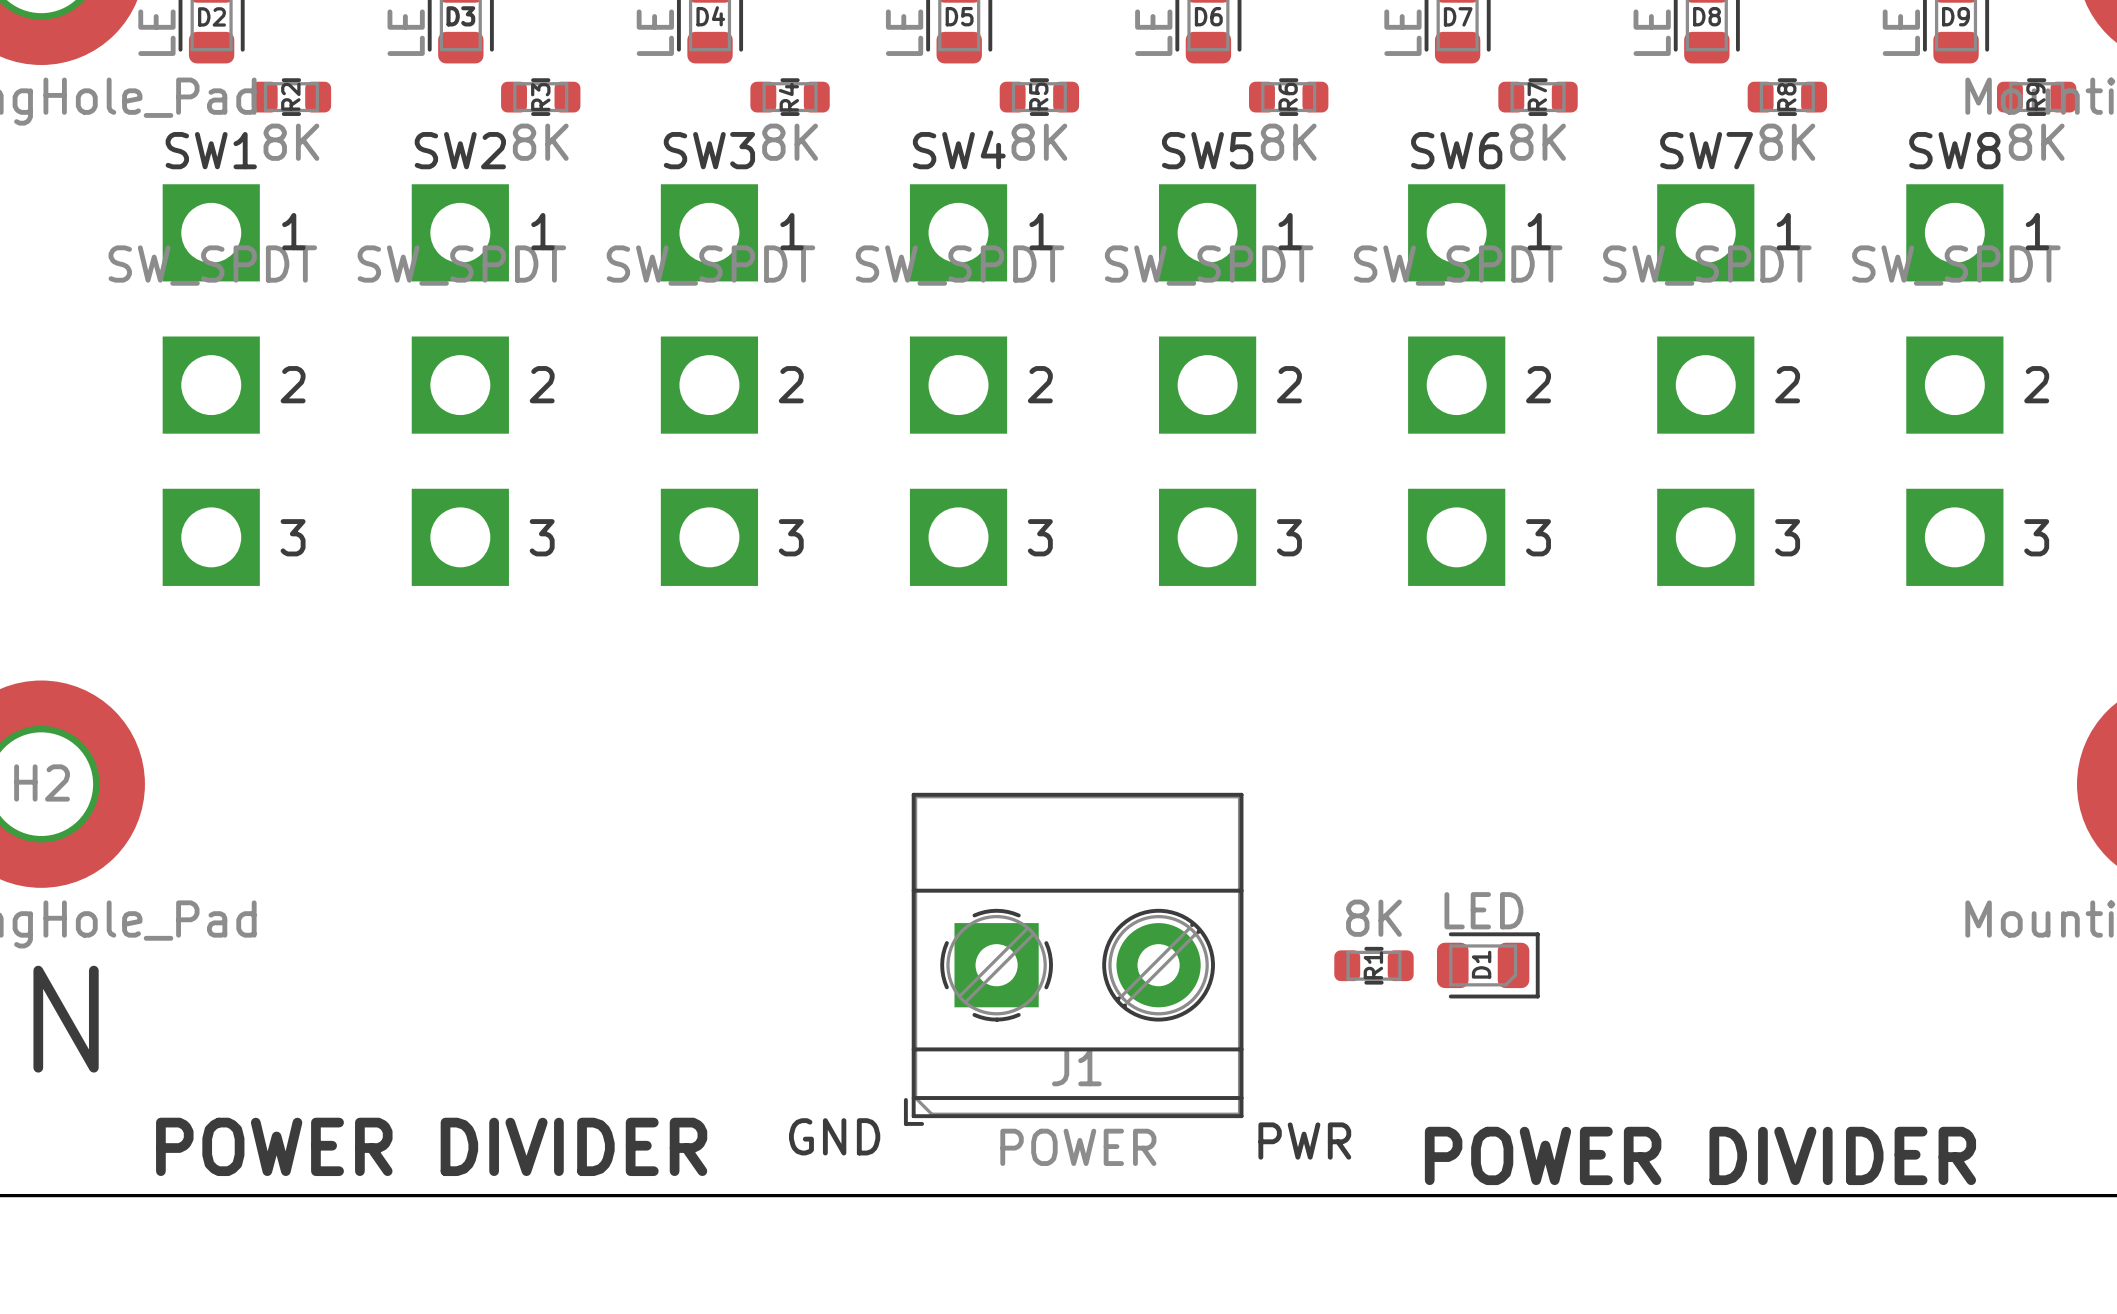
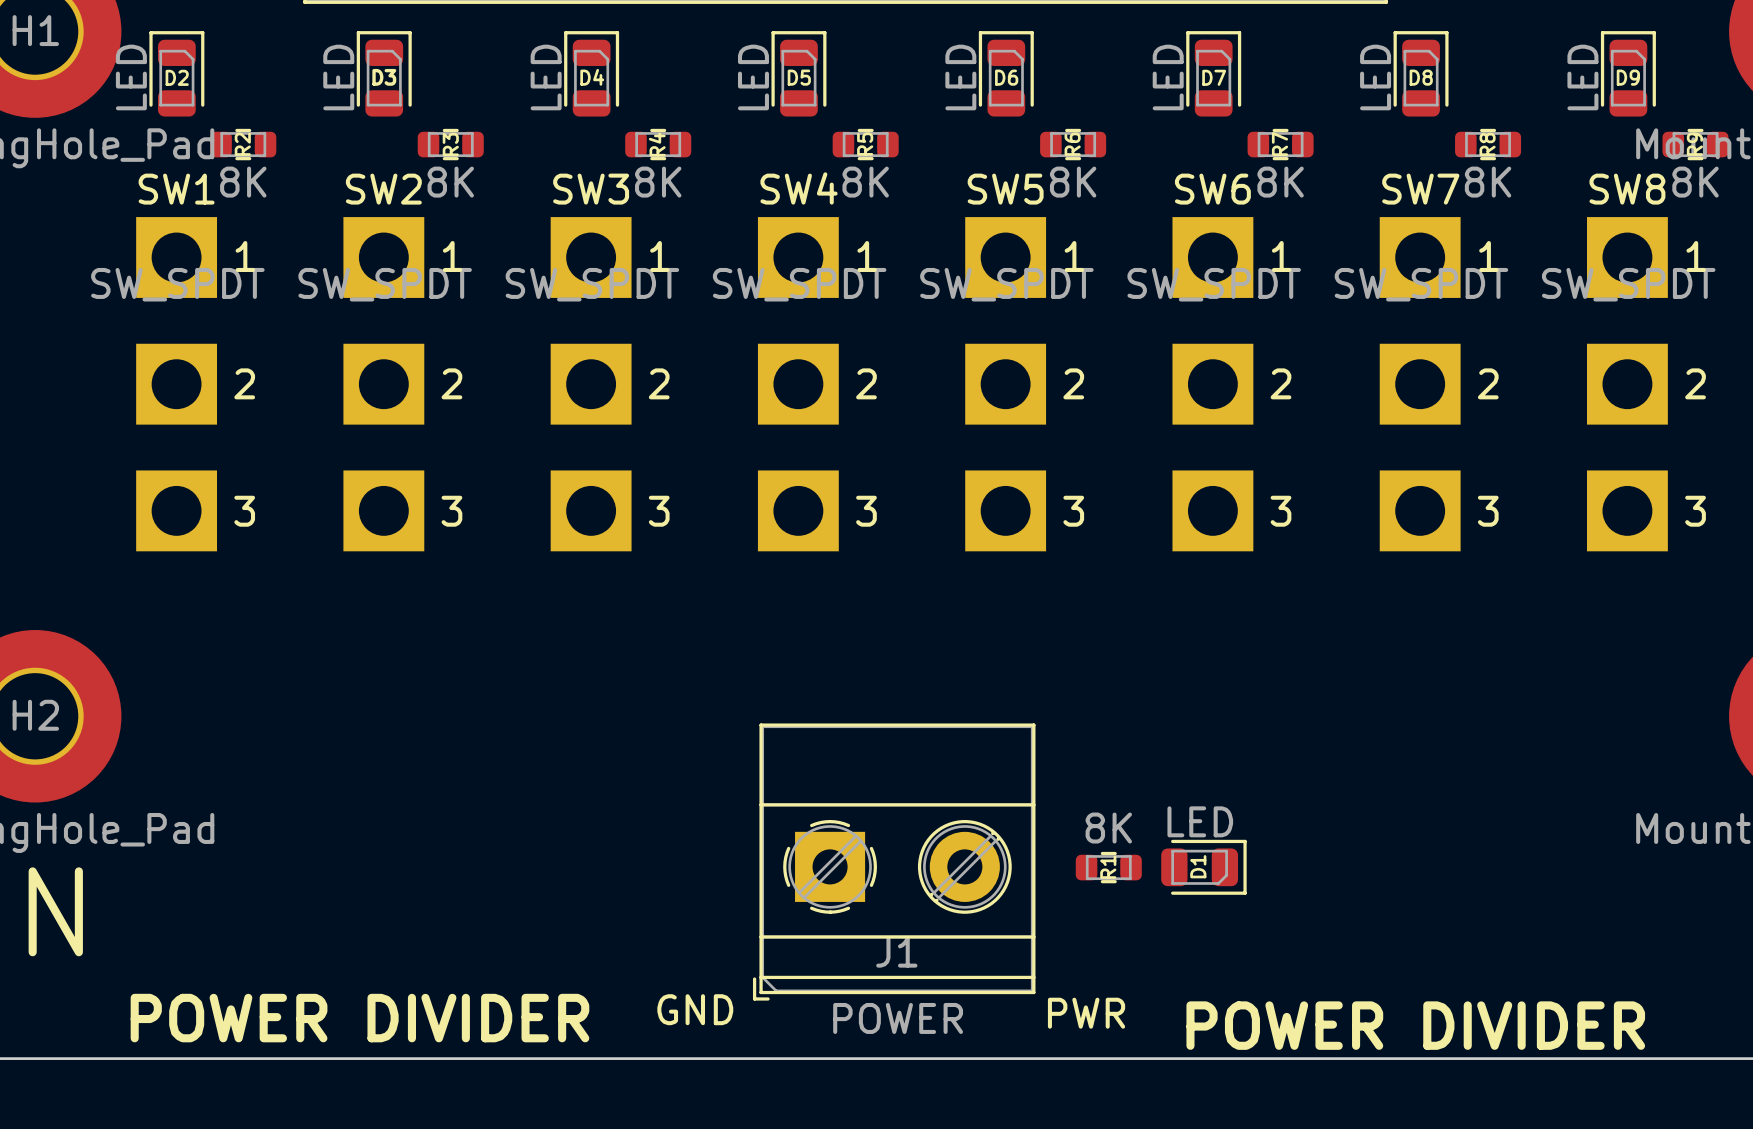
R1 position: (1373, 965) -> (1108, 867)
D1 position: (1488, 965) -> (1203, 867)

